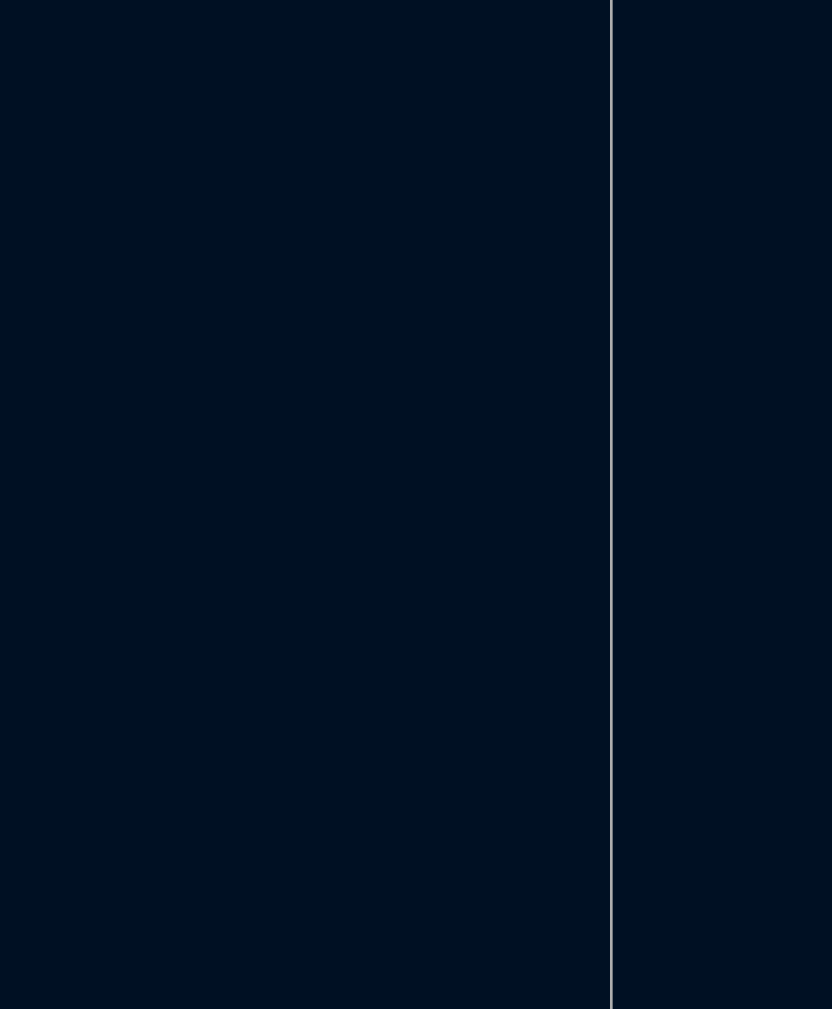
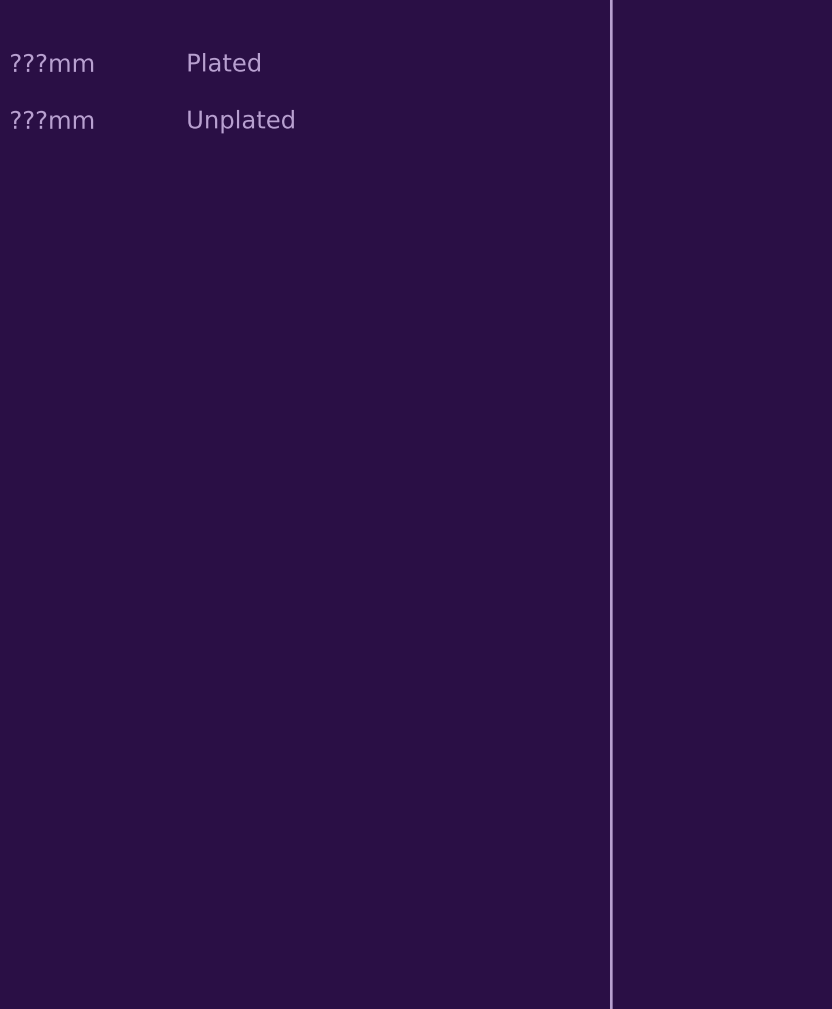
text: none -> Plated (224, 62)
text: none -> ???mm (52, 62)
text: none -> ???mm (52, 119)
text: none -> Unplated (241, 121)

